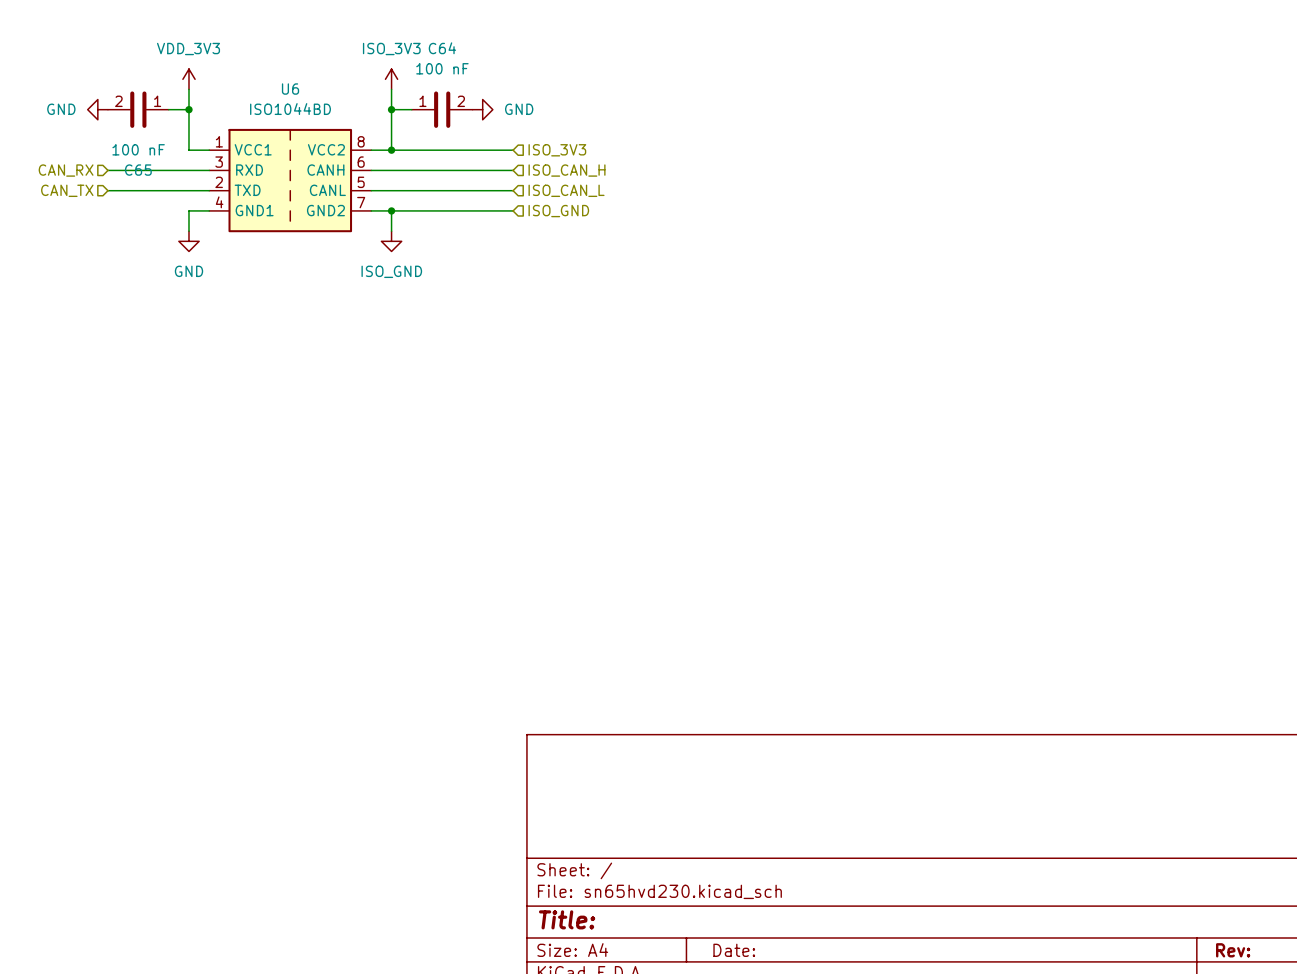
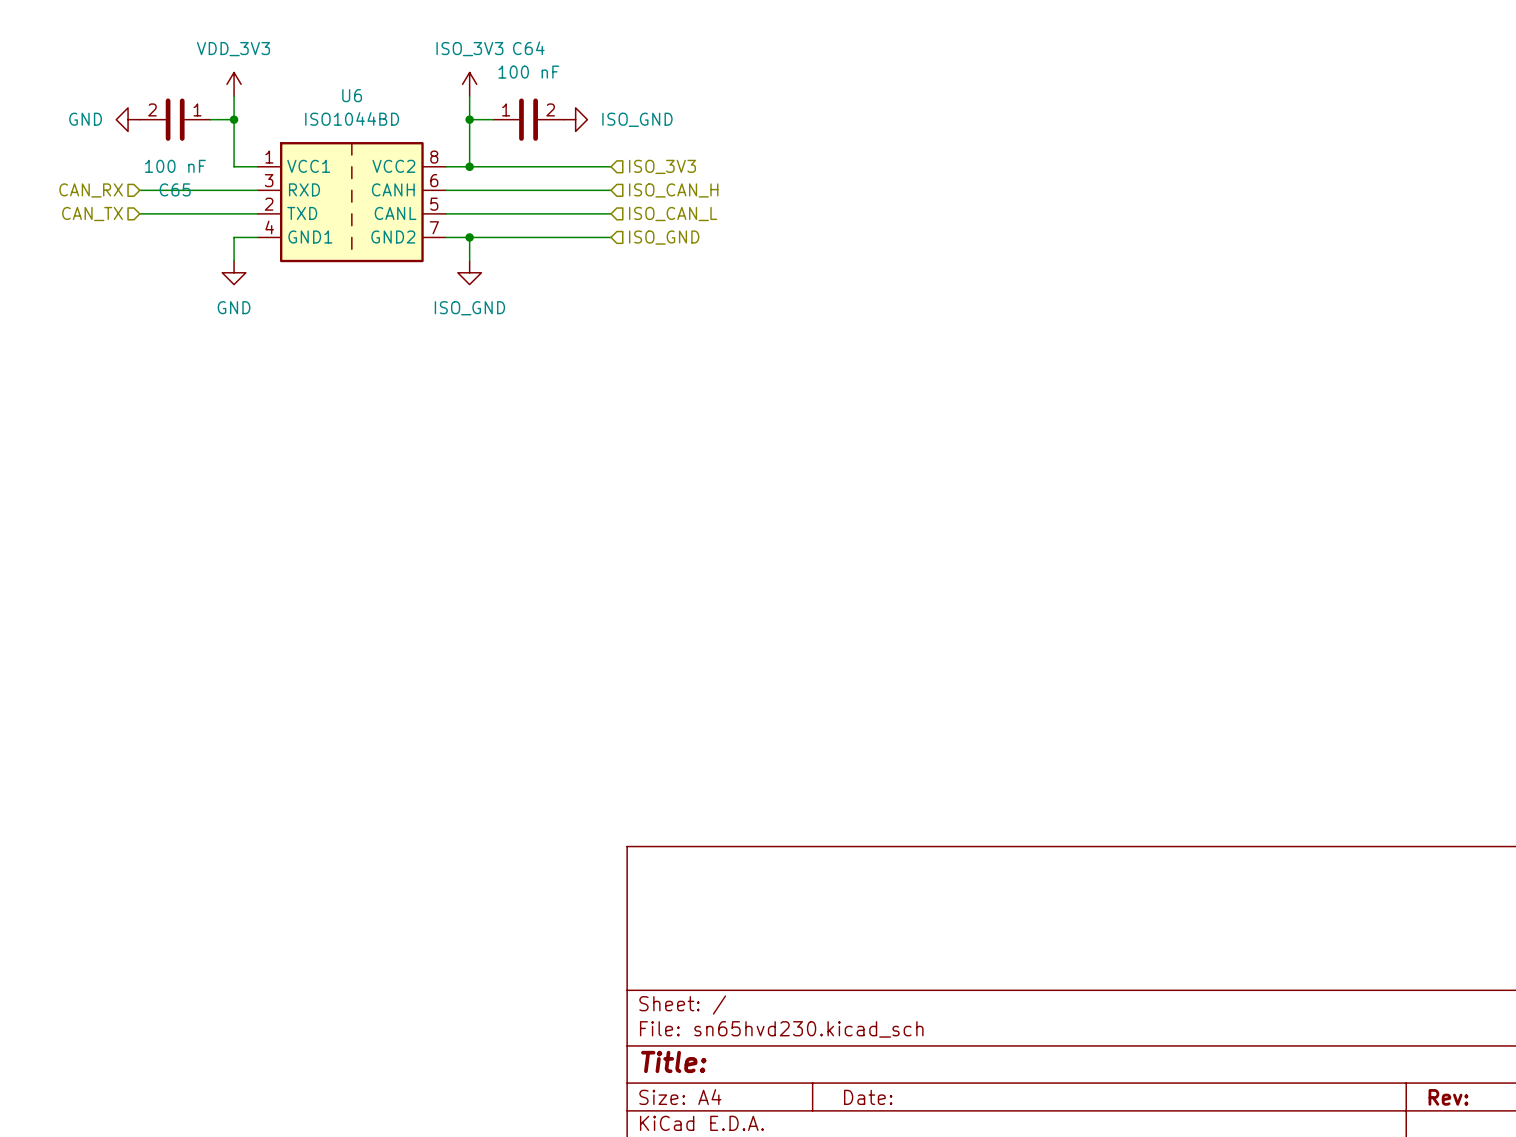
power symbol: GND (482, 109) -> ISO_GND (575, 119)

